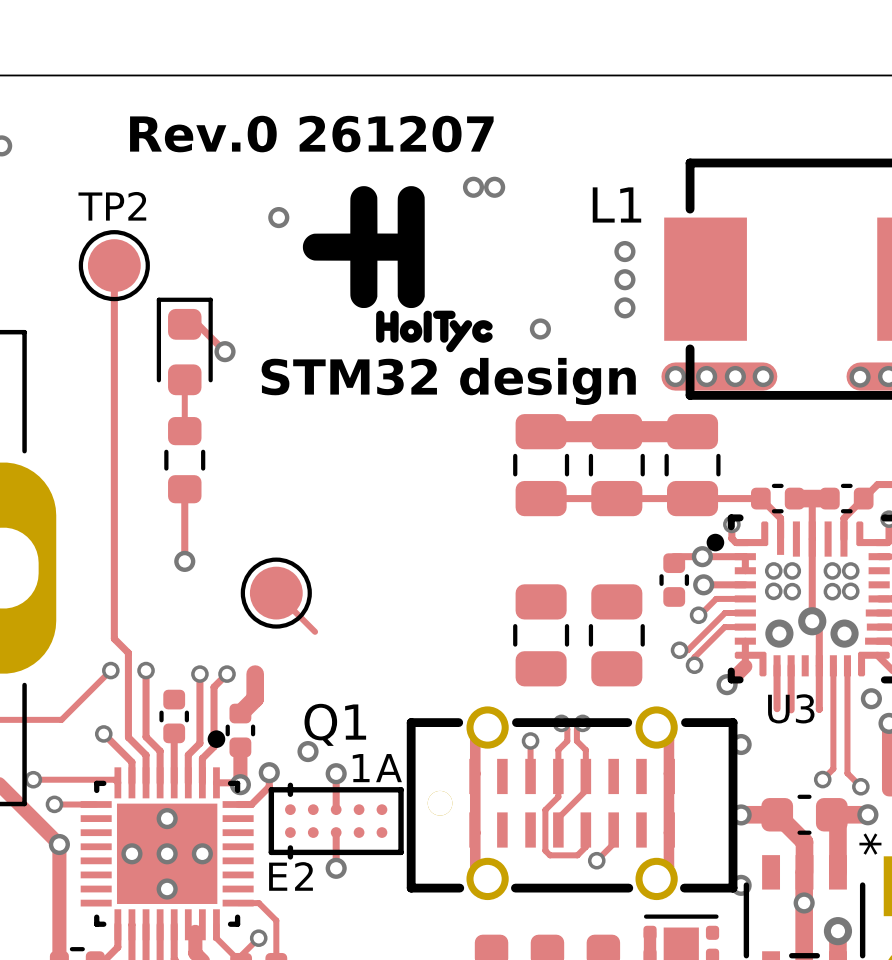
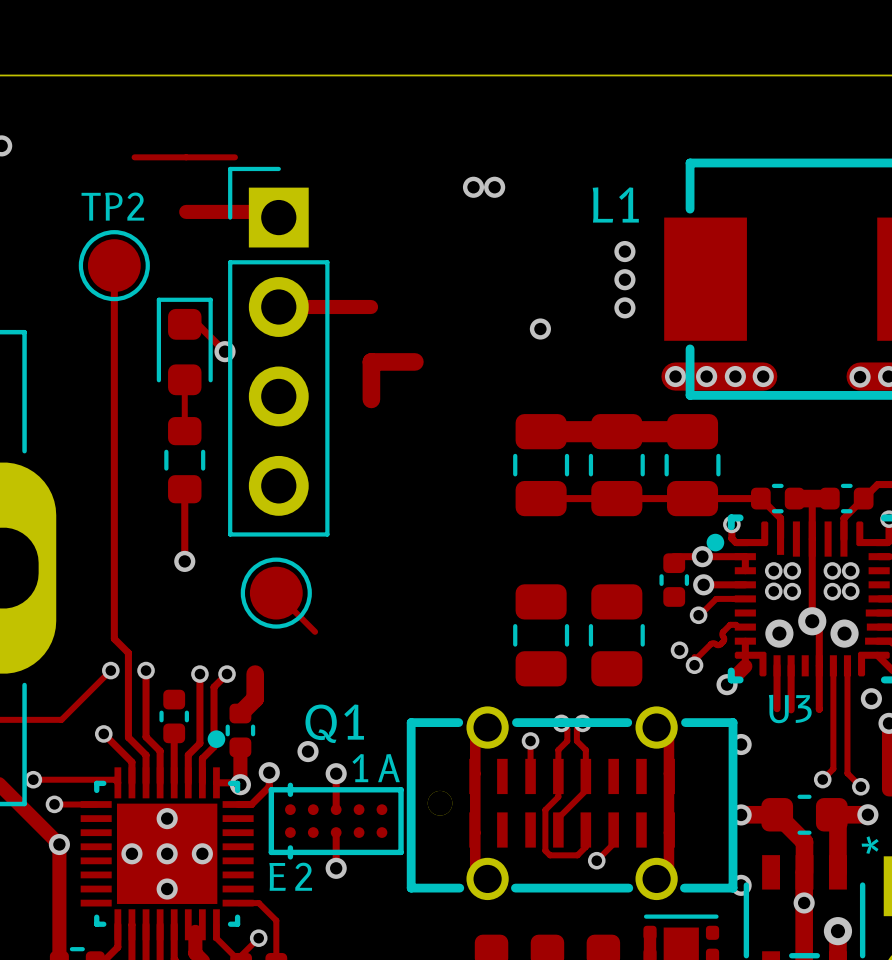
text: Rev.0 261207 (311, 134) -> none
track: none -> (134, 157) (234, 157)
drawing: [302, 186, 493, 353] -> none
track: none -> (186, 211) (273, 211)
via: (278, 217) -> none
track: none -> (285, 307) (371, 307)
part: none -> (278, 351)
track: none -> (414, 361) (371, 361) (371, 399)
text: STM32 design (448, 381) -> none
track: (745, 613) (725, 613) (687, 650) (679, 650) -> none
track: none -> (738, 627) (736, 624) (730, 624) (722, 632) (724, 639) (720, 644) (711, 643) (695, 659) (695, 667)
track: (745, 627) (724, 627) (694, 657) -> none

